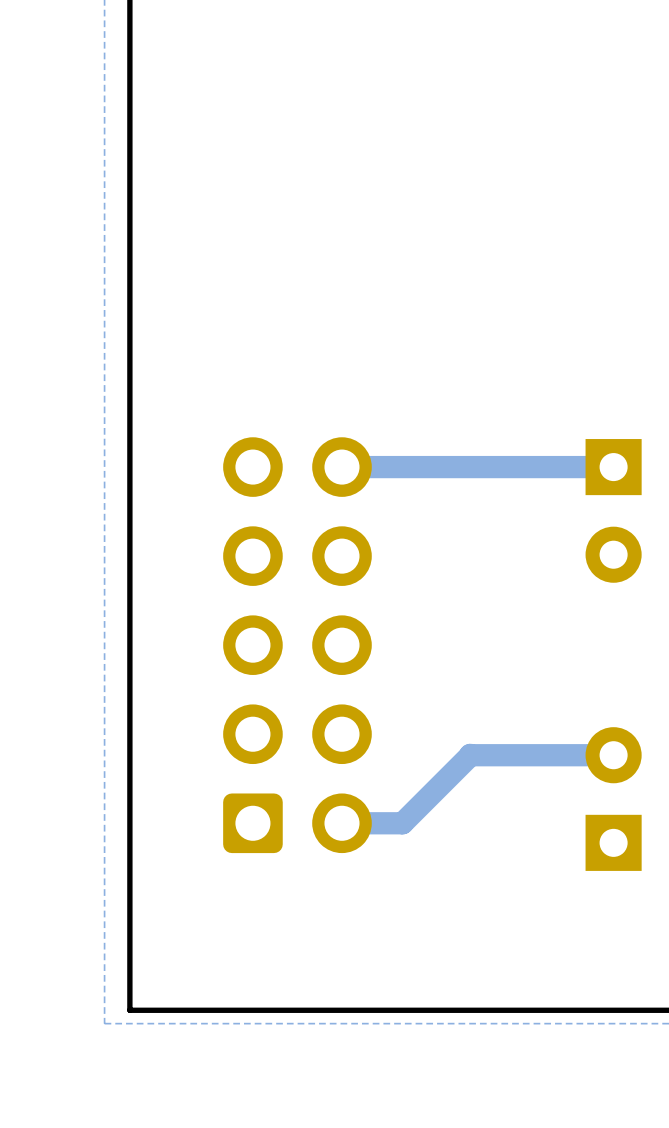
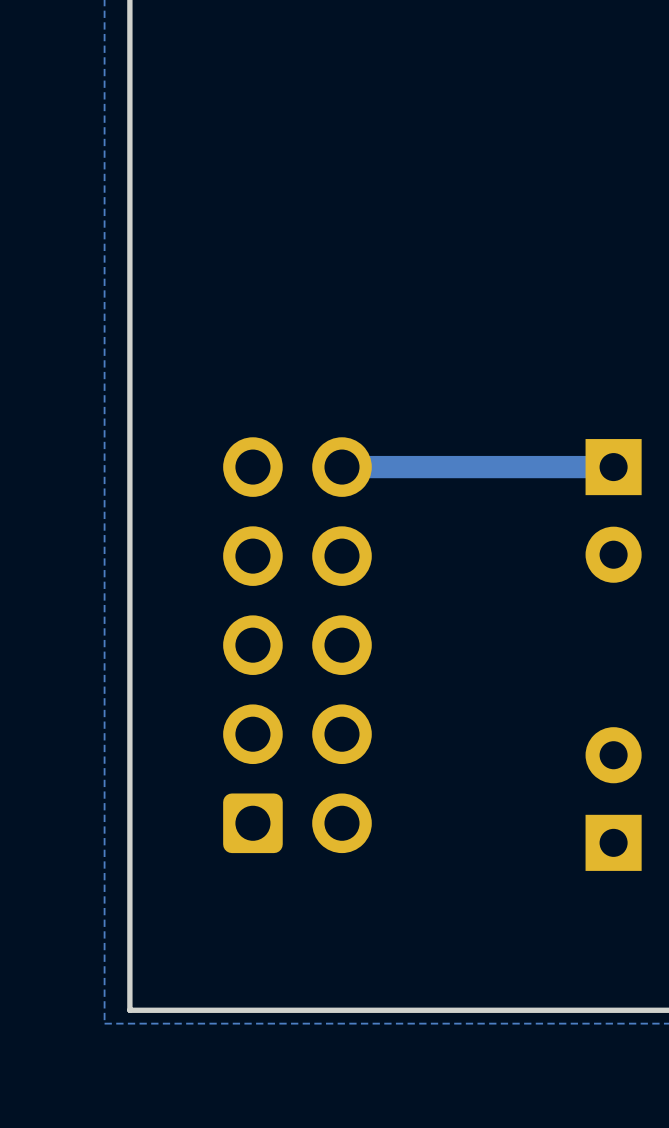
track: (613, 755) (470, 755) (402, 823) (341, 823) -> none

